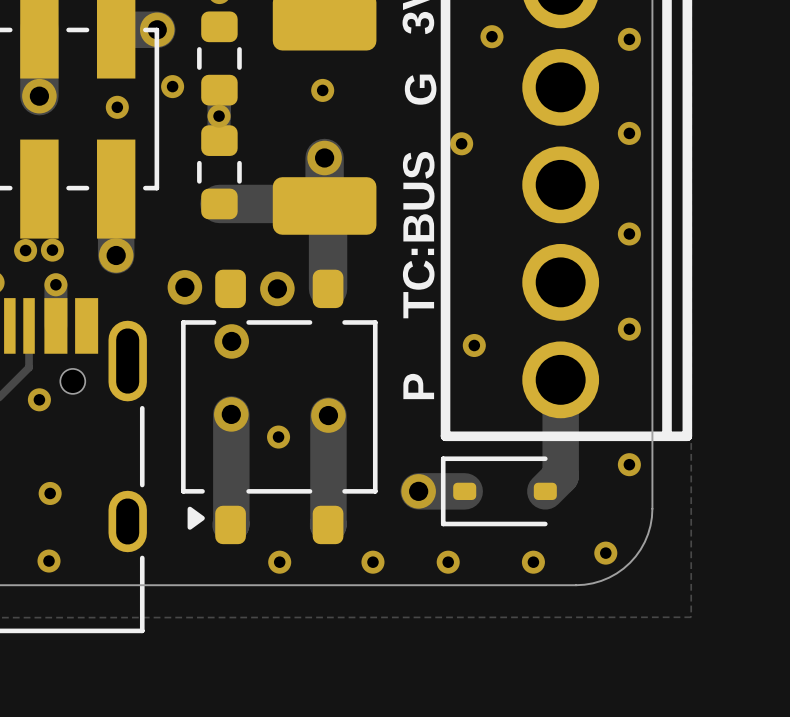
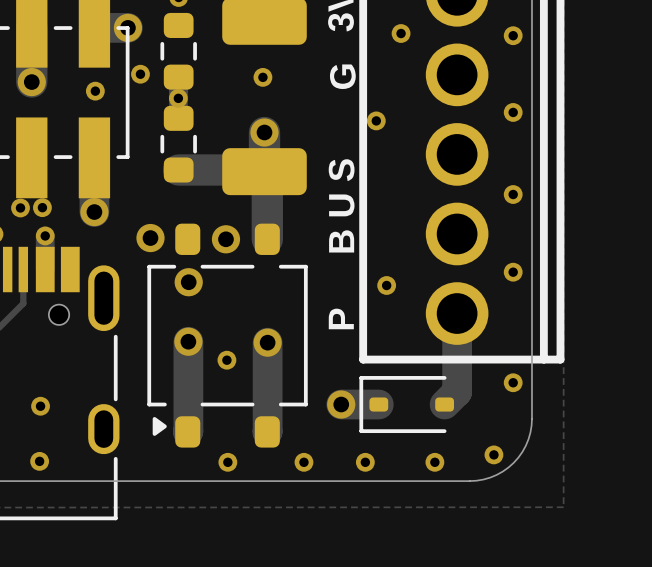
text: TC:BUS (418, 235) -> B U S (341, 205)
via: (39, 399) -> none

